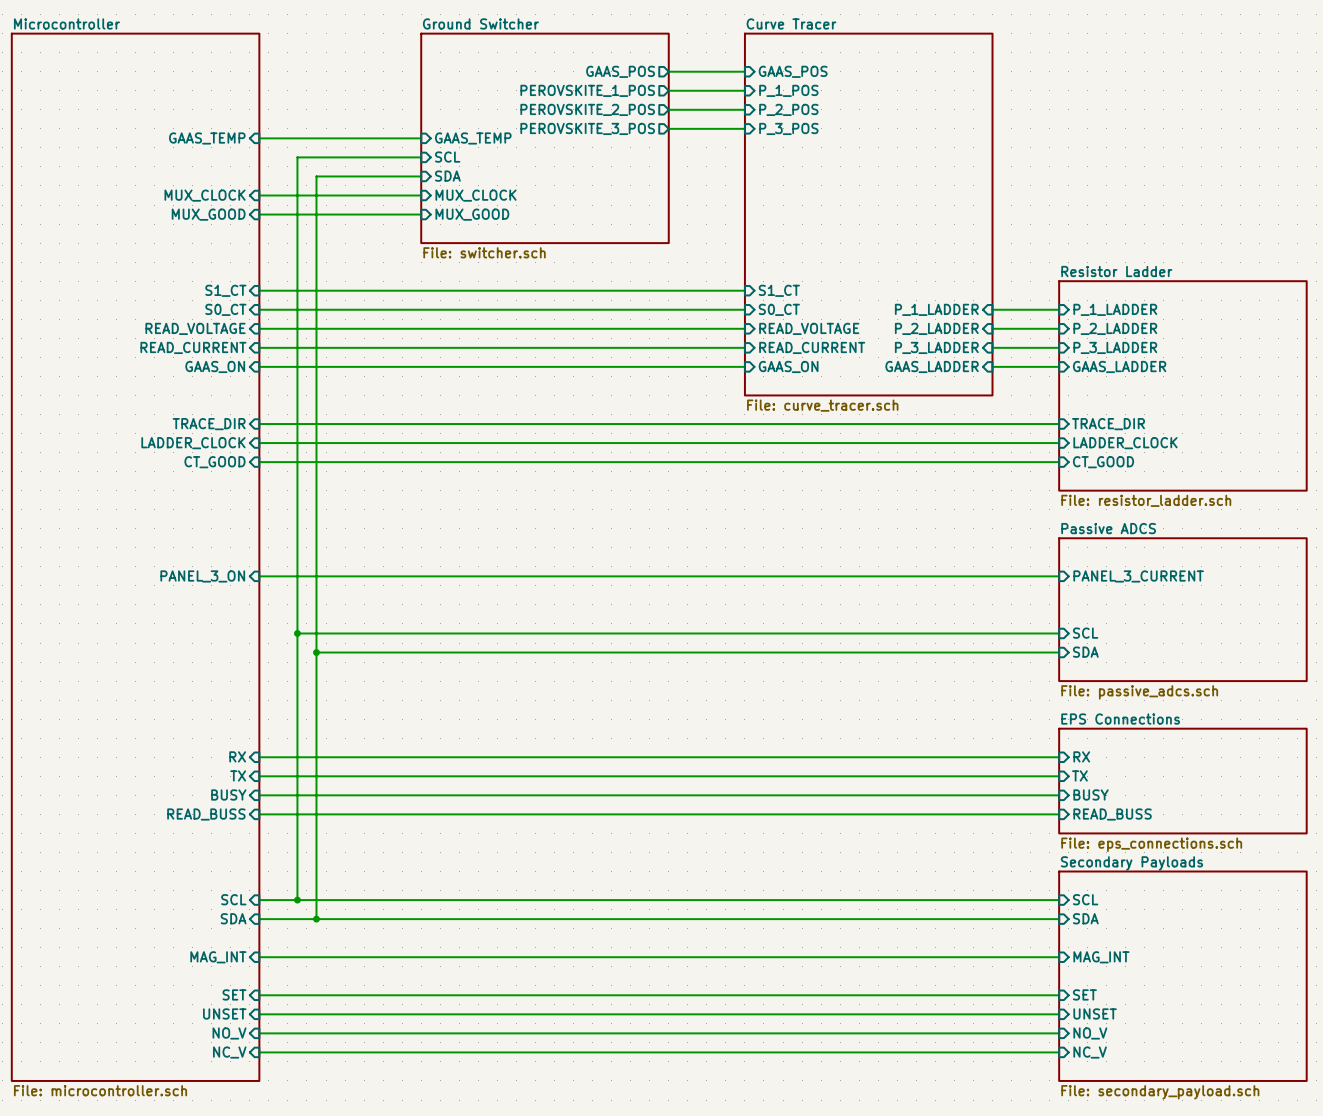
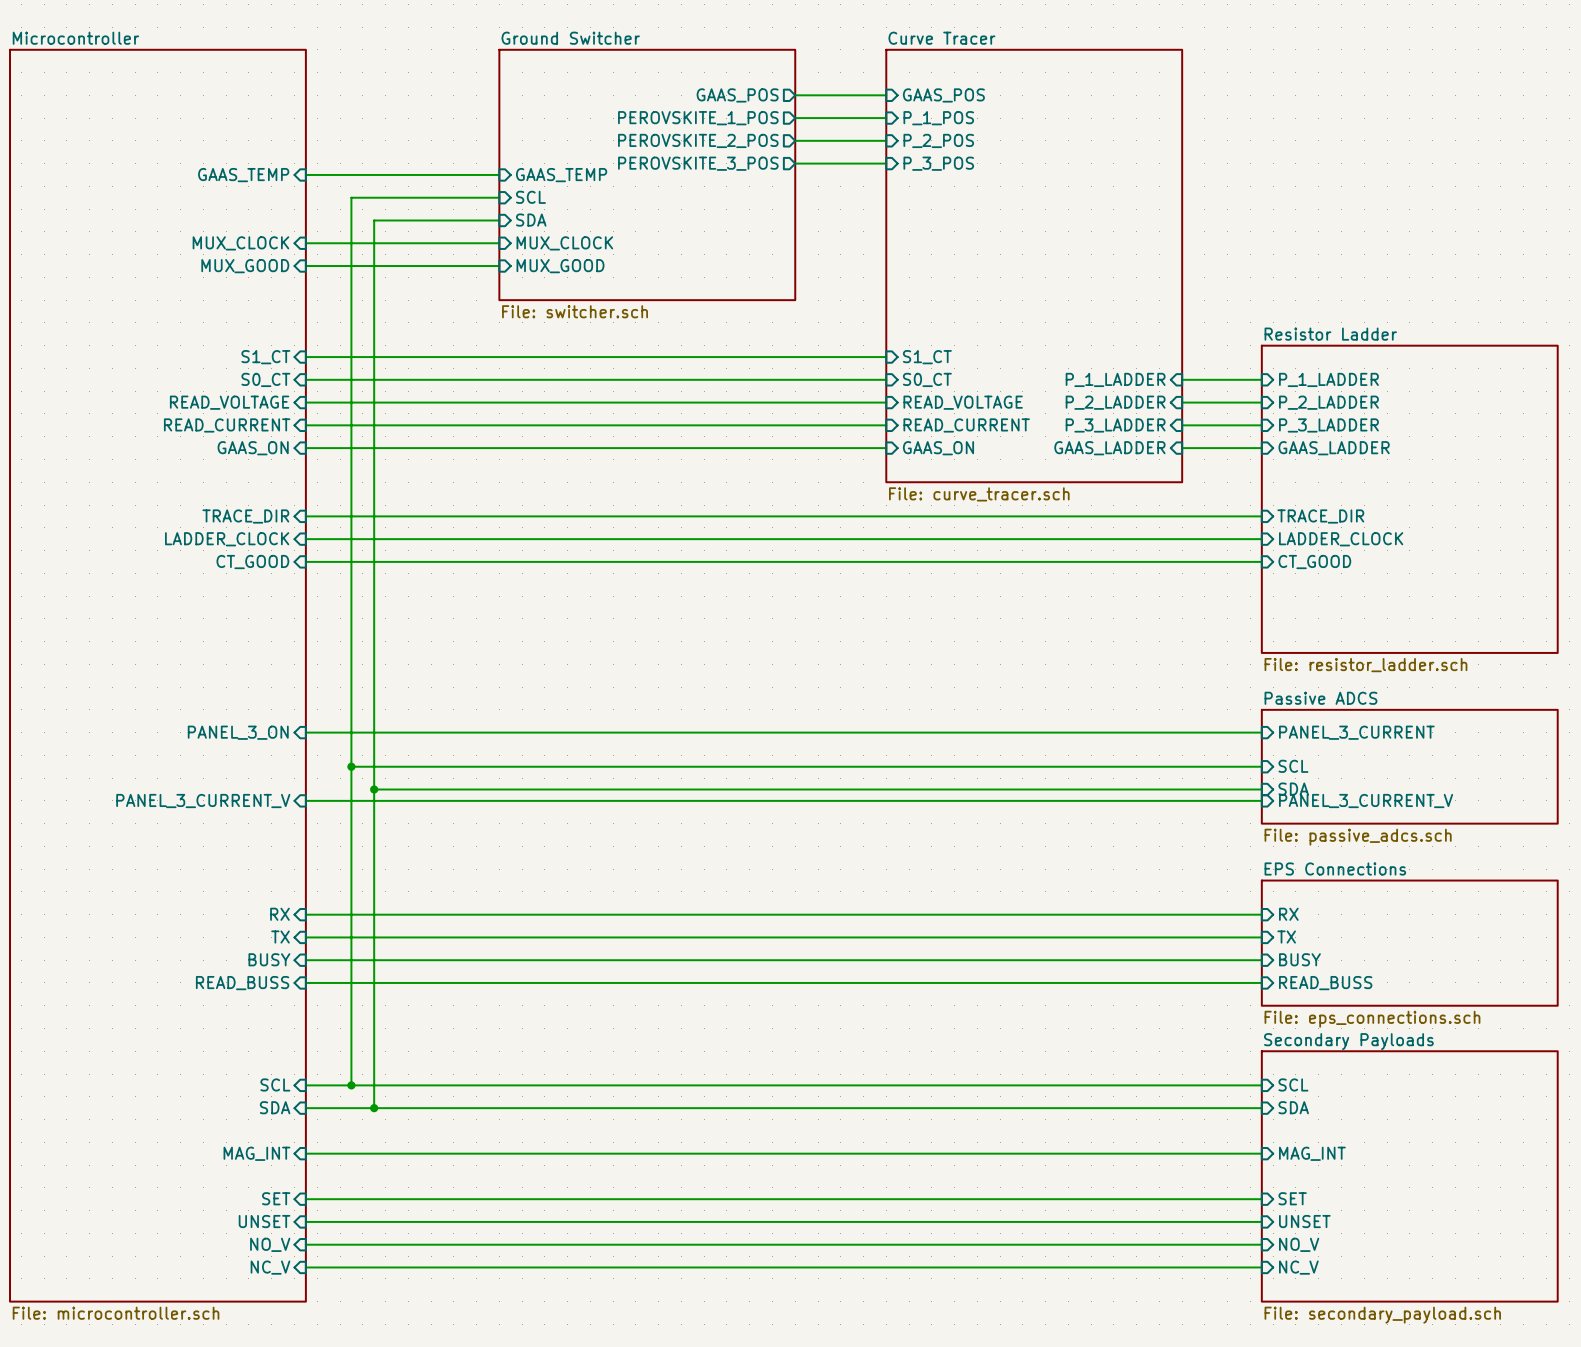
sheet Resistor Ladder: File: resistor_ladder.sch (1182, 385) -> none
sheet Resistor Ladder: none -> File: resistor_ladder.sch (1409, 499)
sheet pin position: PANEL_3_ON (202, 576) -> PANEL_3_ON (238, 732)
wire: (259, 576) (1059, 576) -> (305, 732) (1261, 732)
sheet pin position: PANEL_3_CURRENT (1138, 576) -> PANEL_3_CURRENT (1356, 732)
sheet Passive ADCS: File: passive_adcs.sch (1182, 609) -> none
sheet Passive ADCS: none -> File: passive_adcs.sch (1409, 766)
sheet pin: none -> PANEL_3_CURRENT_V (203, 801)
wire: none -> (305, 800) (1261, 800)
sheet pin: none -> PANEL_3_CURRENT_V (1366, 801)

